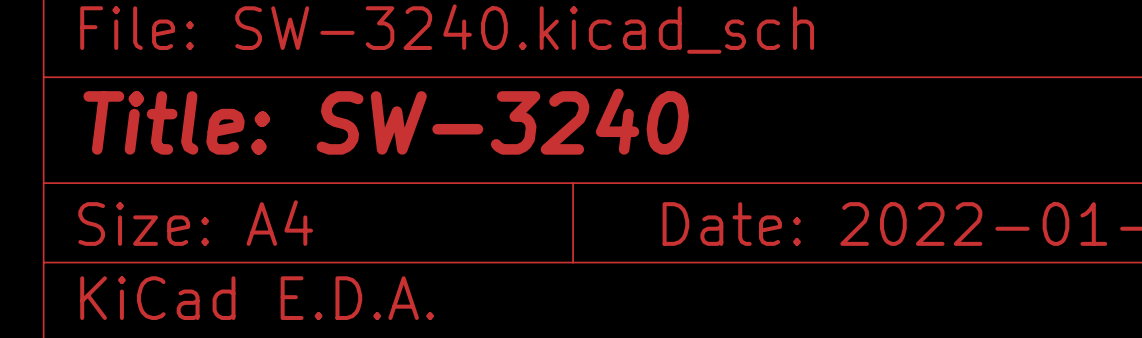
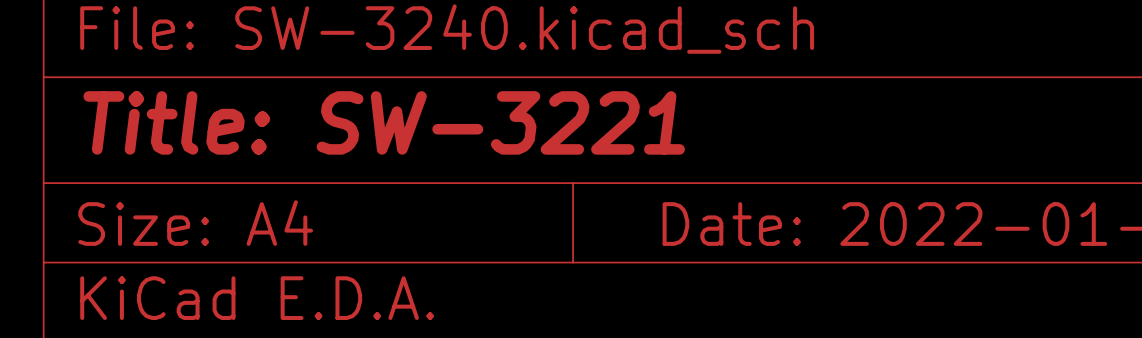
title block: Title: SW-3240 (386, 121) -> Title: SW-3221 (384, 122)

